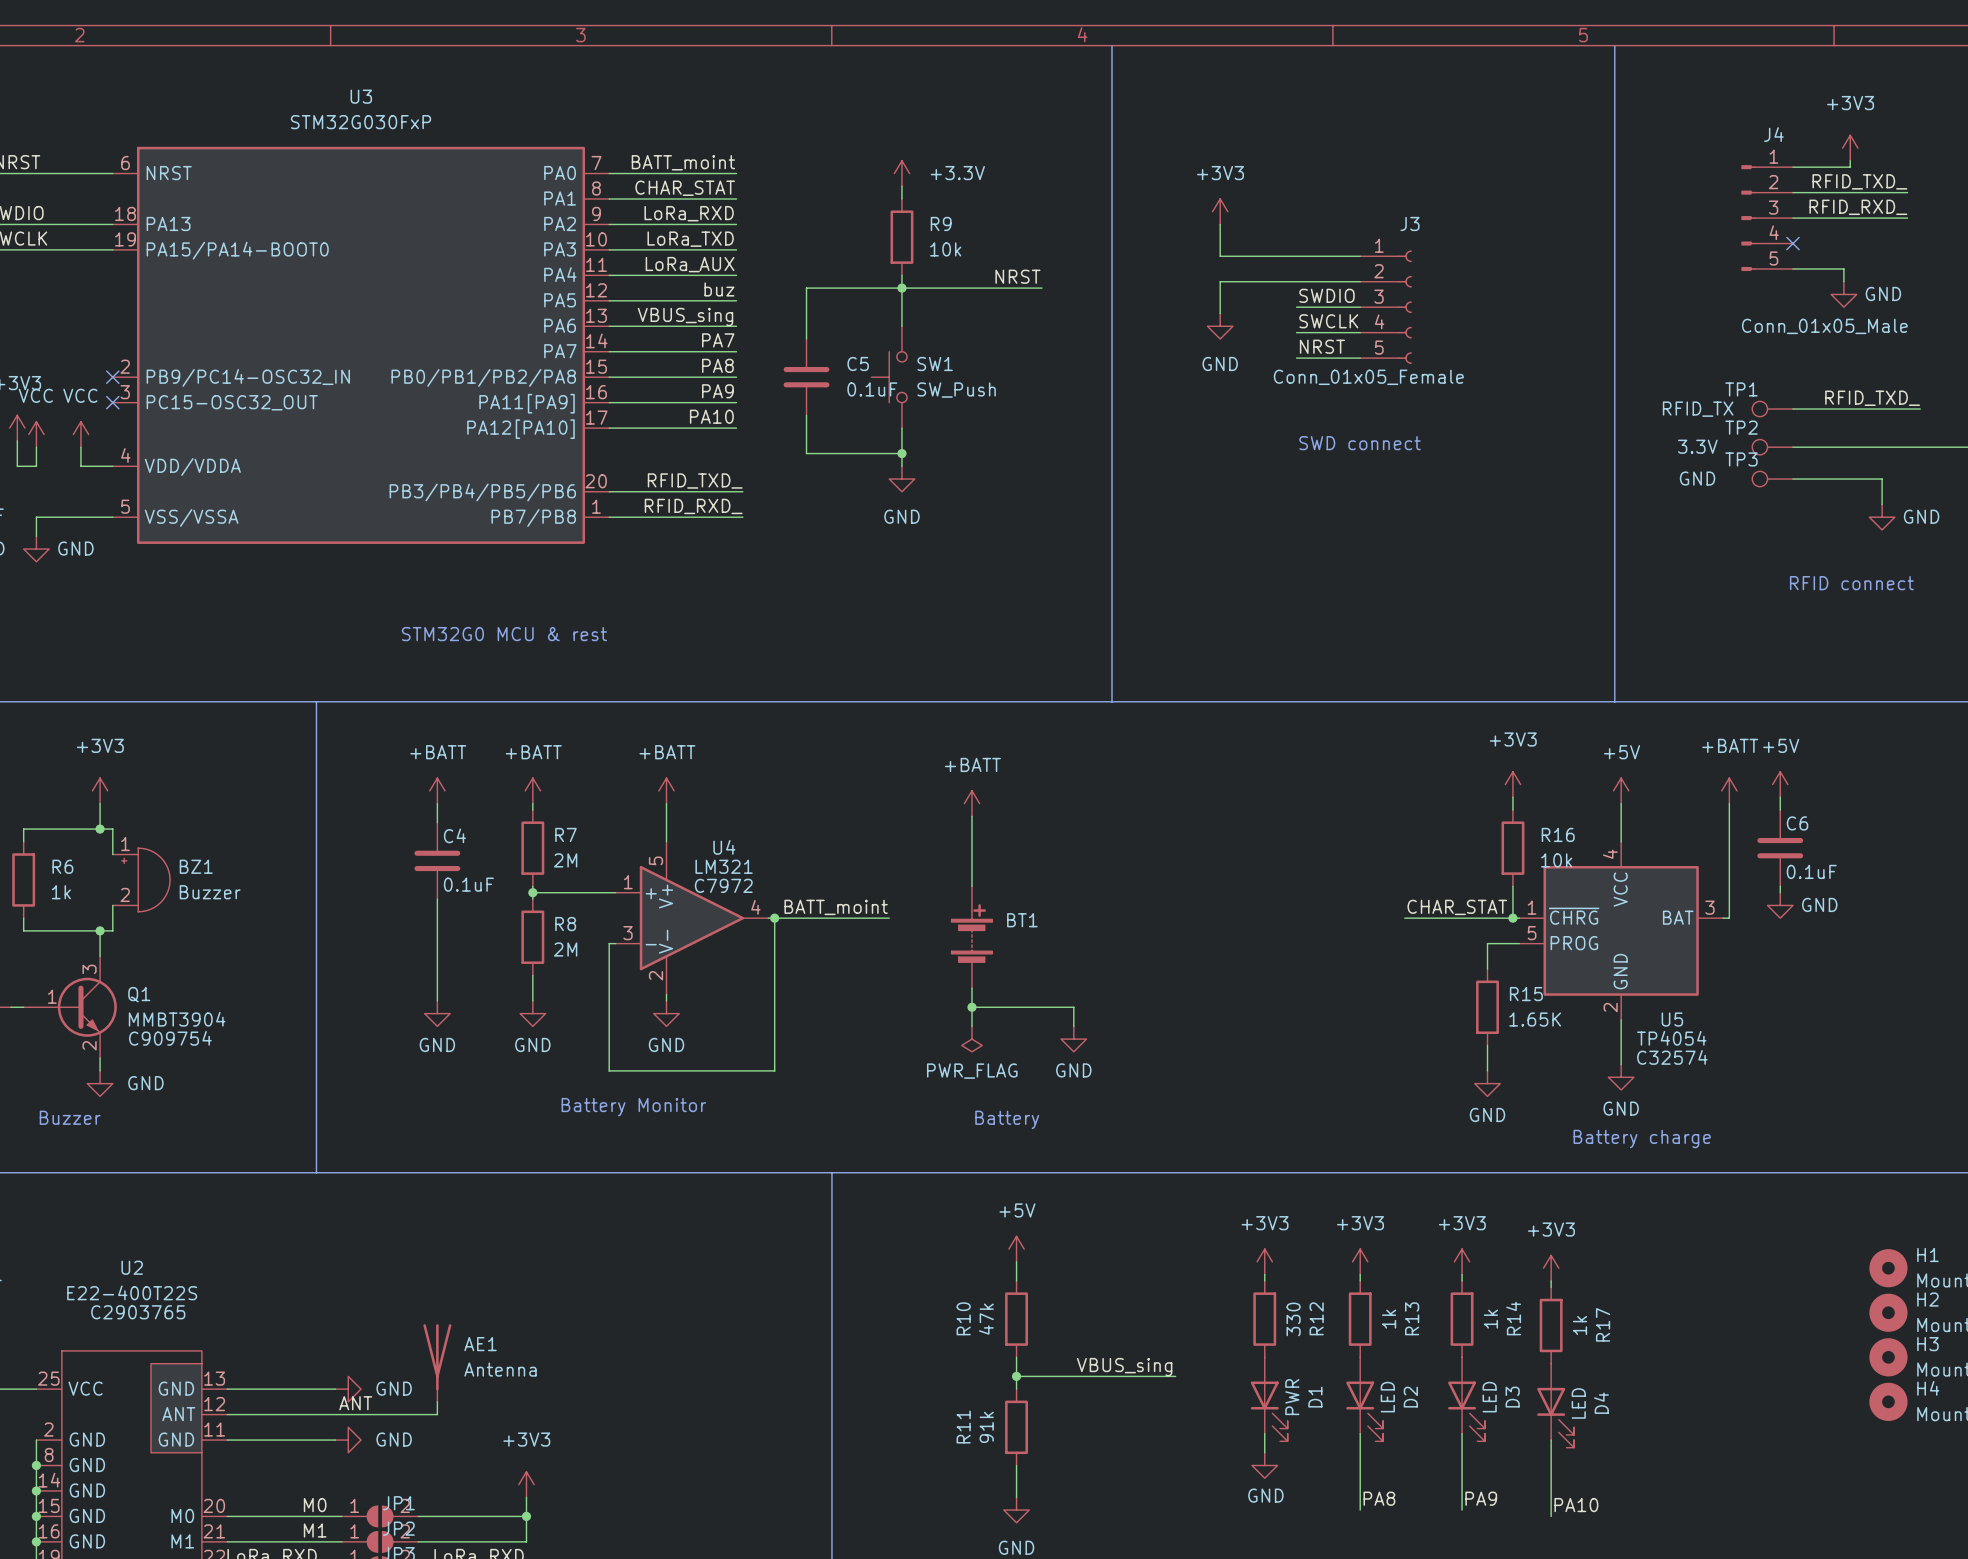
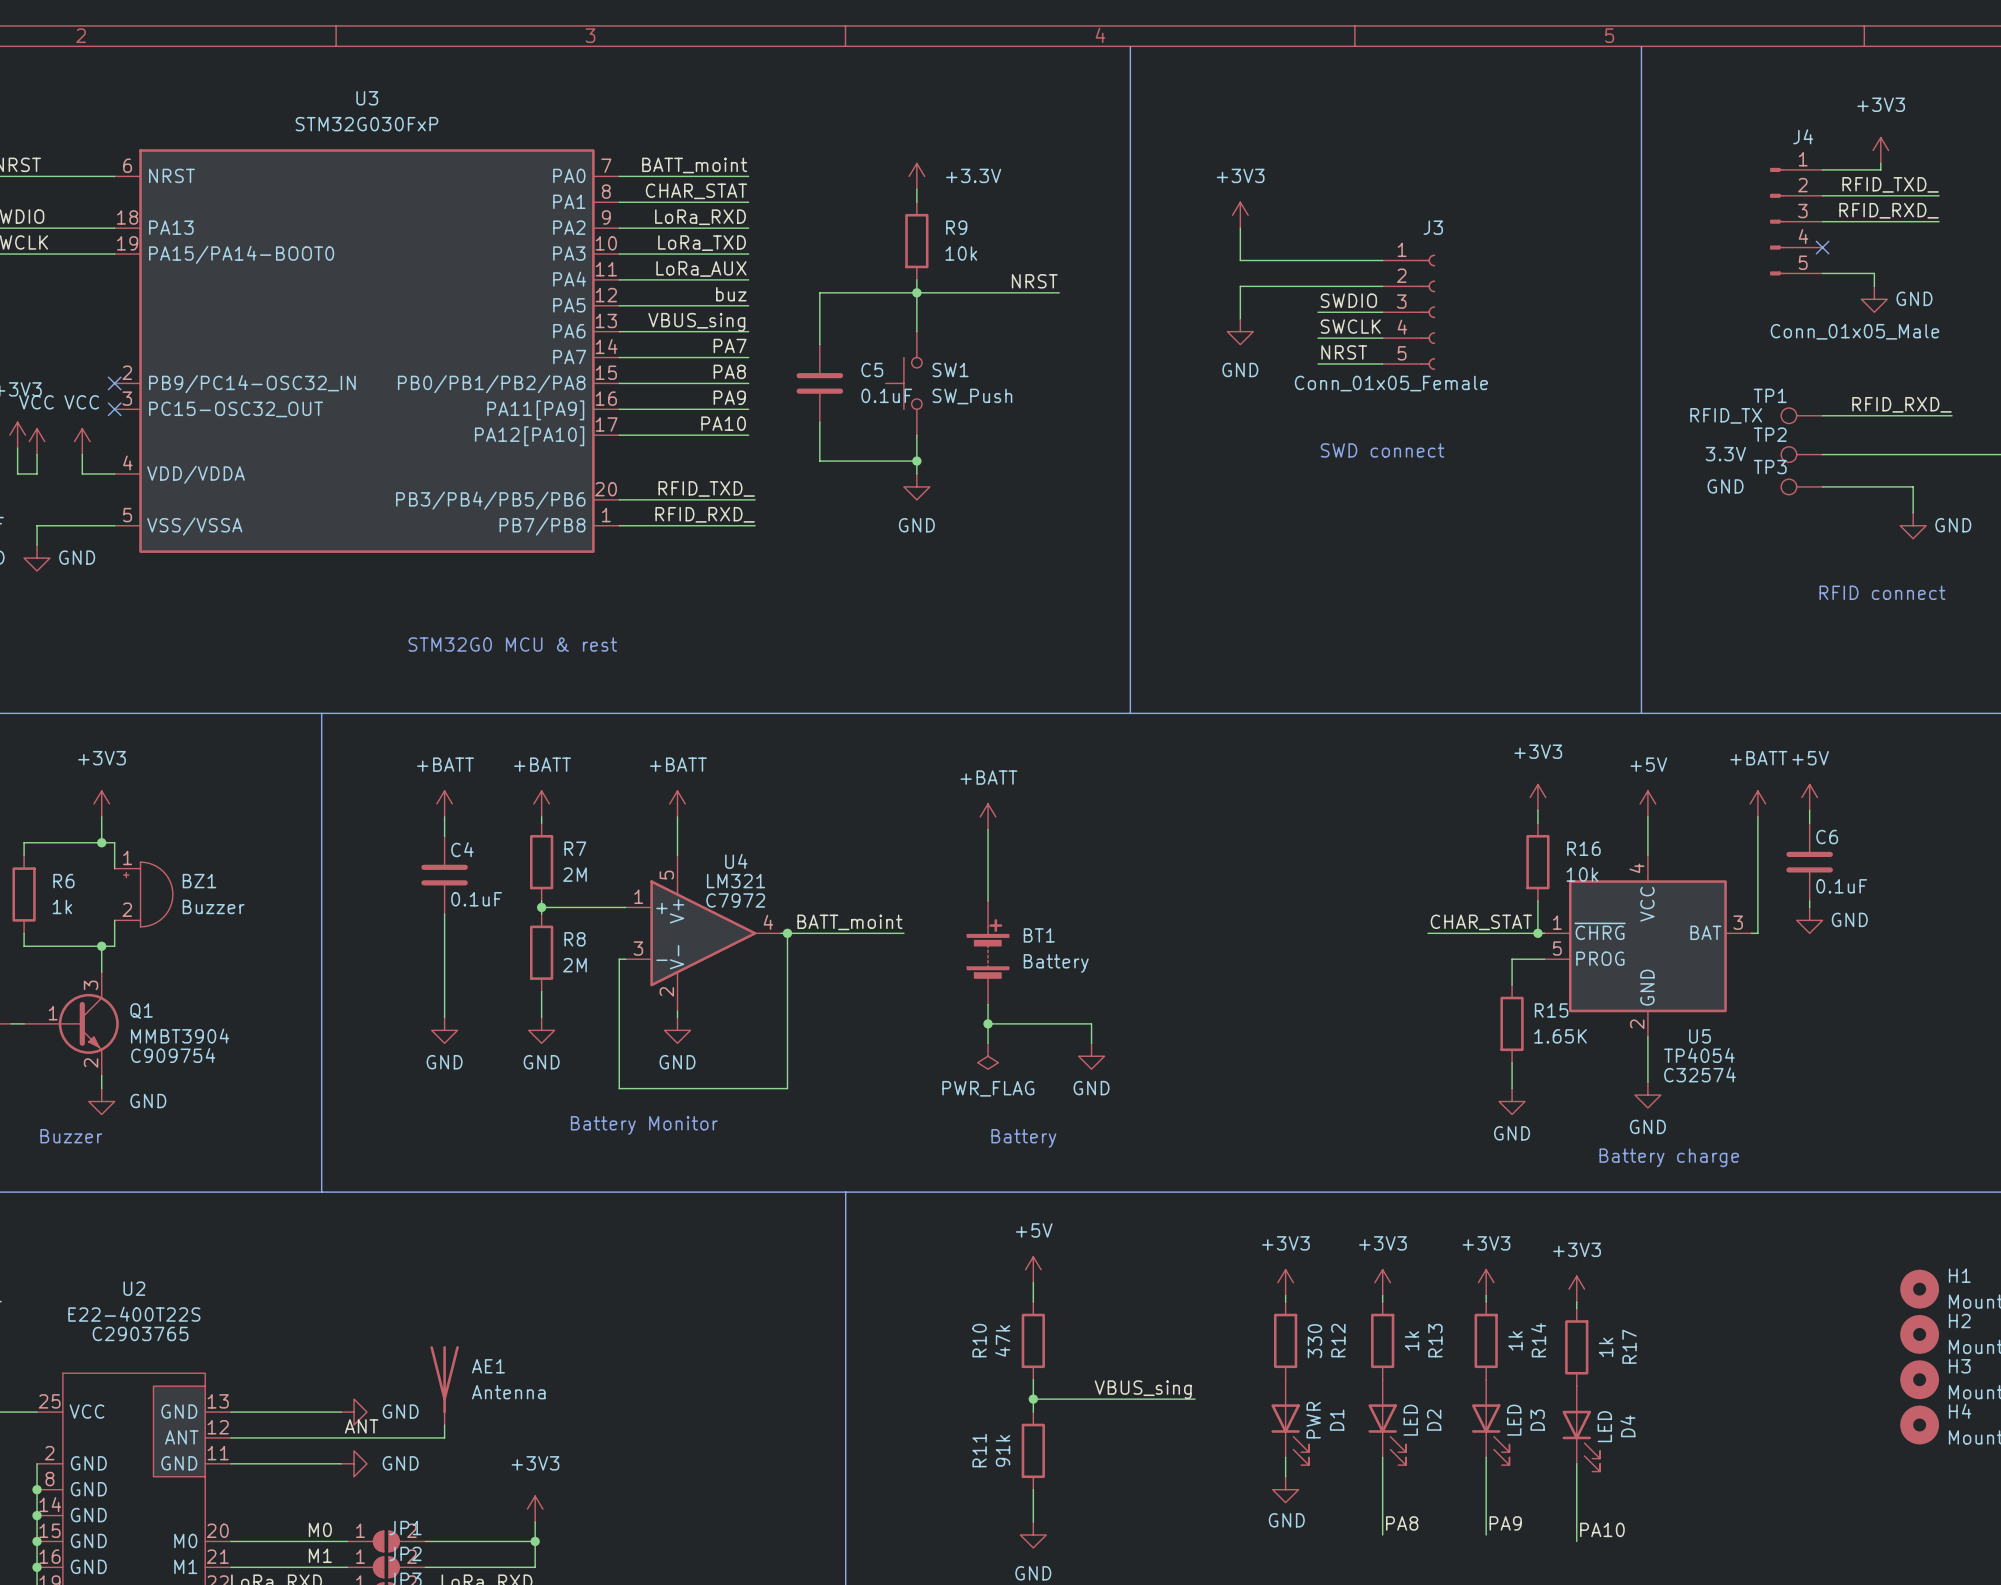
label: RFID_TXD_ (1872, 398) -> RFID_RXD_ (1901, 404)
BT1 value: none -> Battery (1056, 963)

